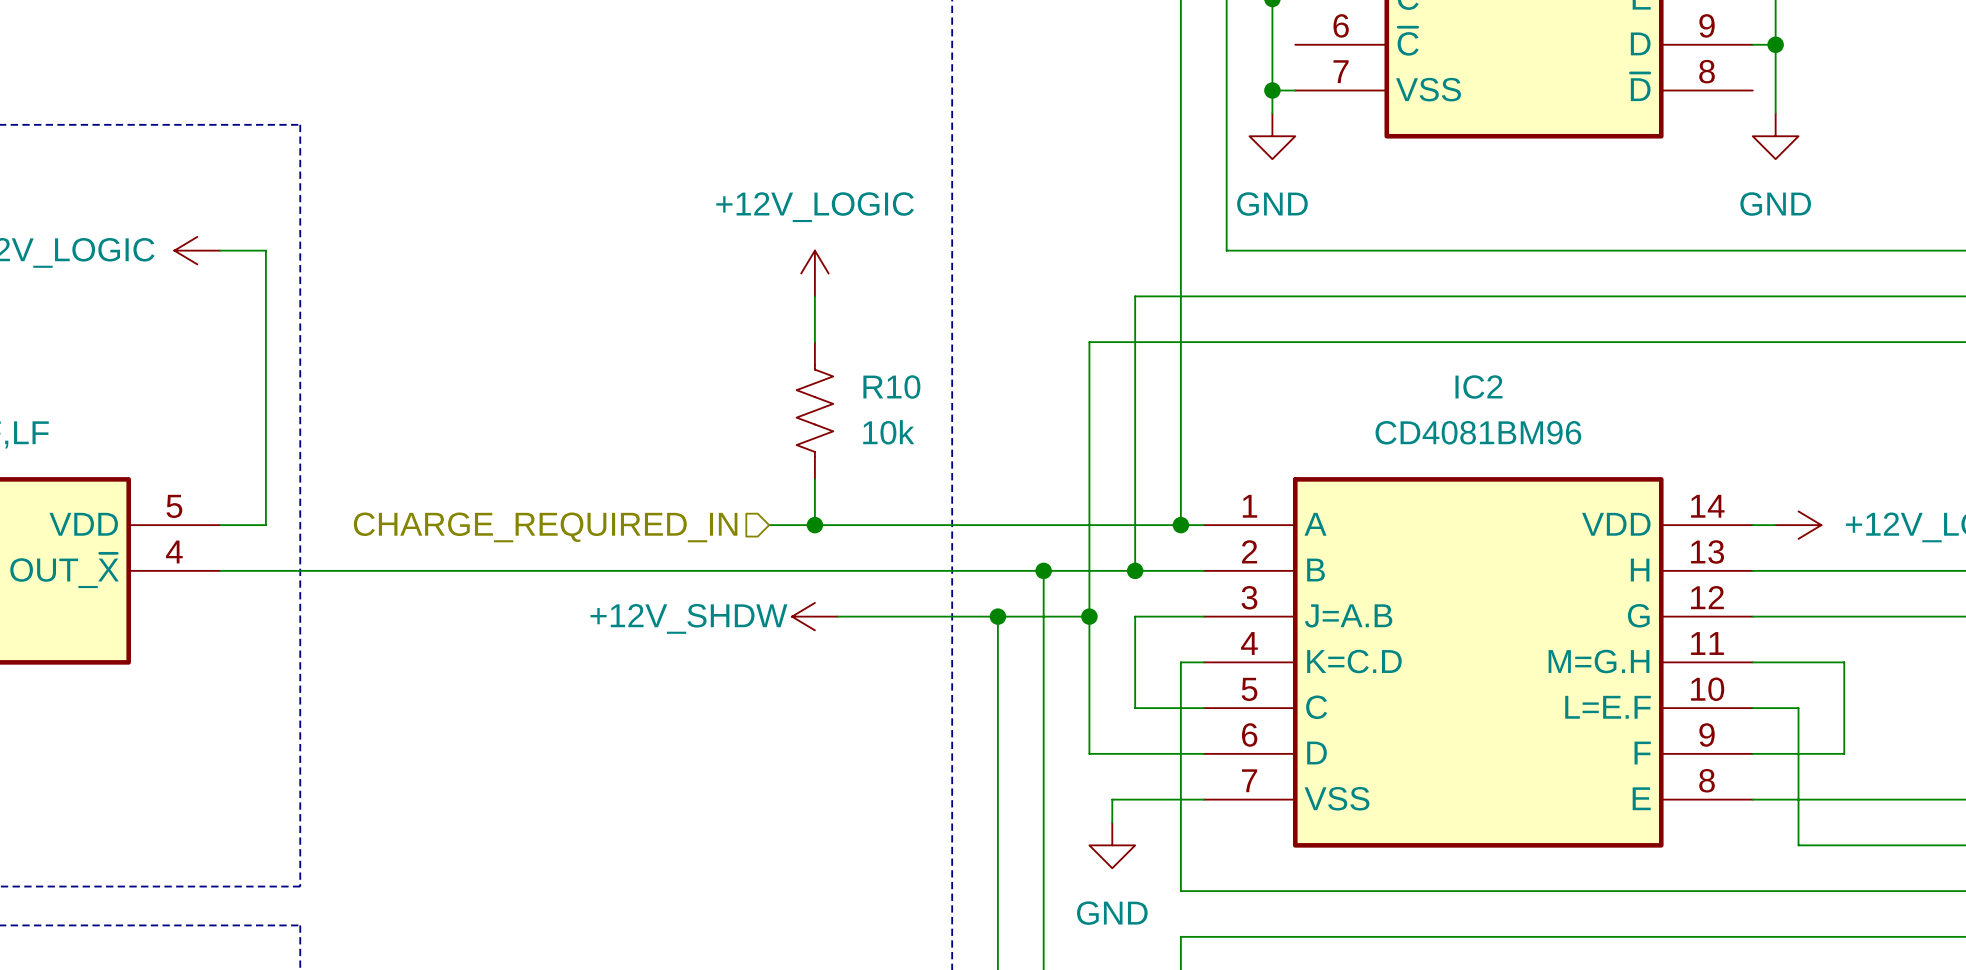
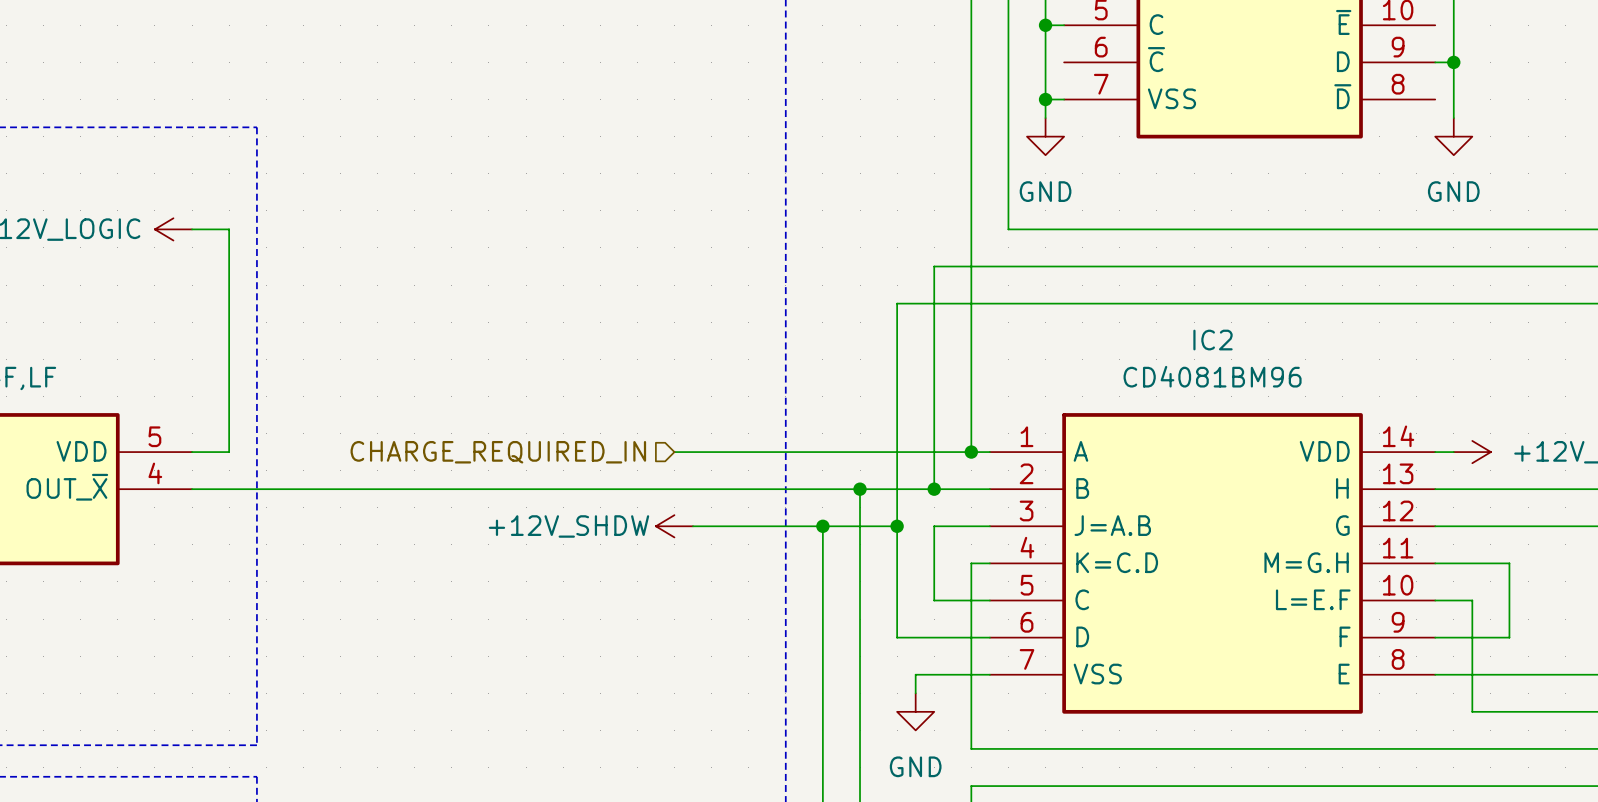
power symbol: +12V_LOGIC (814, 273) -> none
wire: (814, 296) (814, 342) -> none
R10: 10k (814, 410) -> none
wire: (814, 479) (814, 525) (769, 525) -> none
junction: (814, 525) -> none
hierarchical label position: CHARGE_REQUIRED_IN (545, 527) -> CHARGE_REQUIRED_IN (498, 452)

